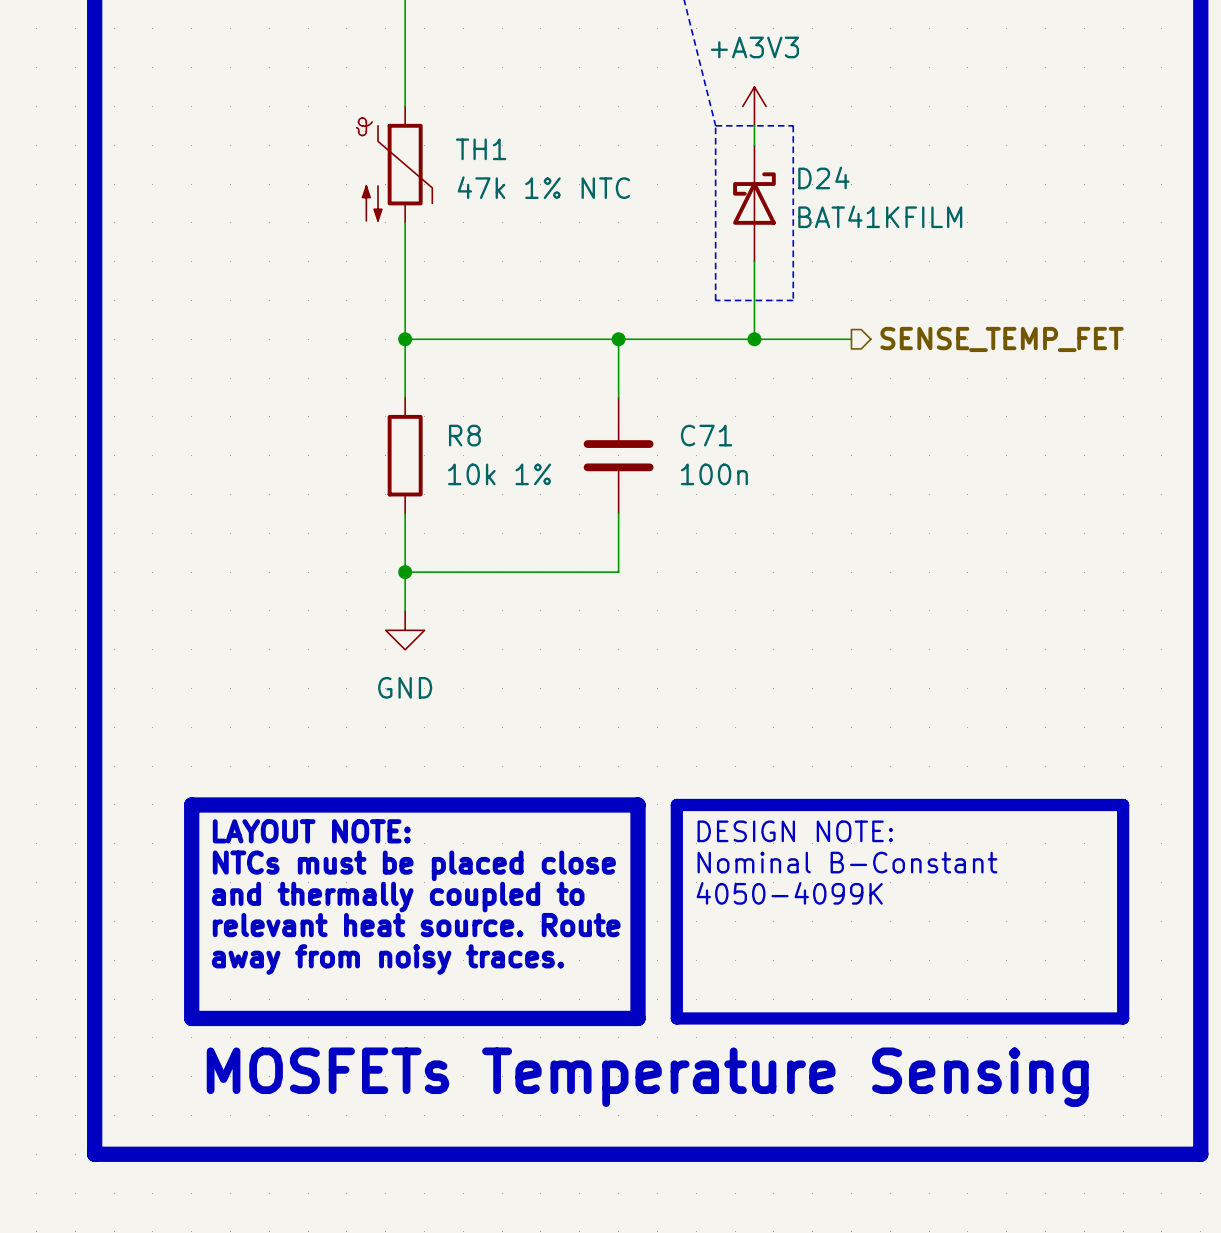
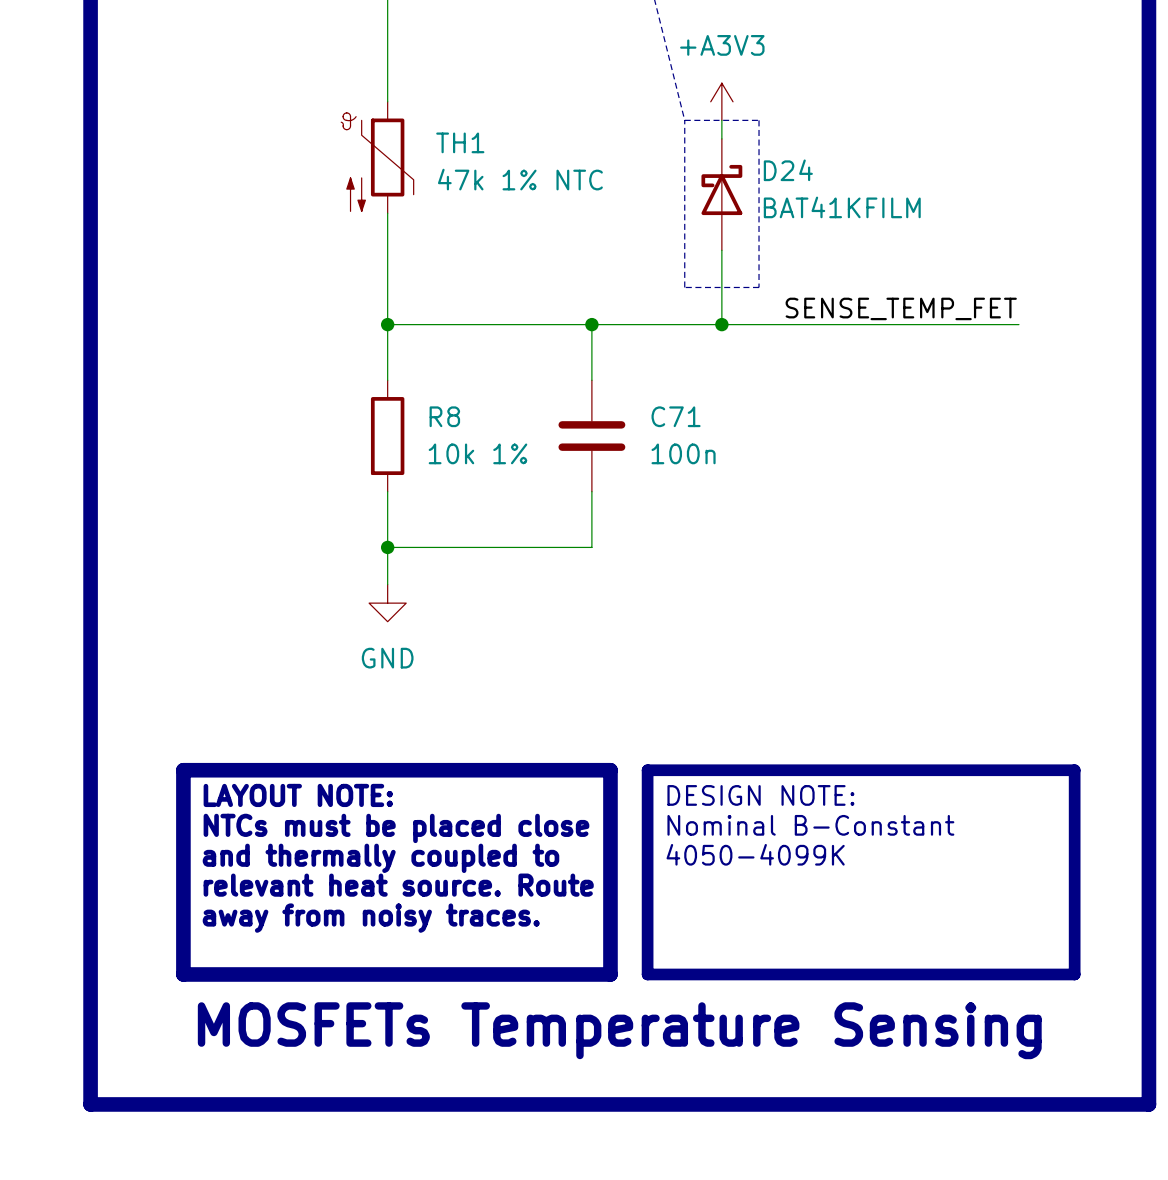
label: none -> SENSE_TEMP_FET (901, 308)
wire: none -> (814, 324) (1018, 324)
hierarchical label: SENSE_TEMP_FET (1002, 339) -> none

